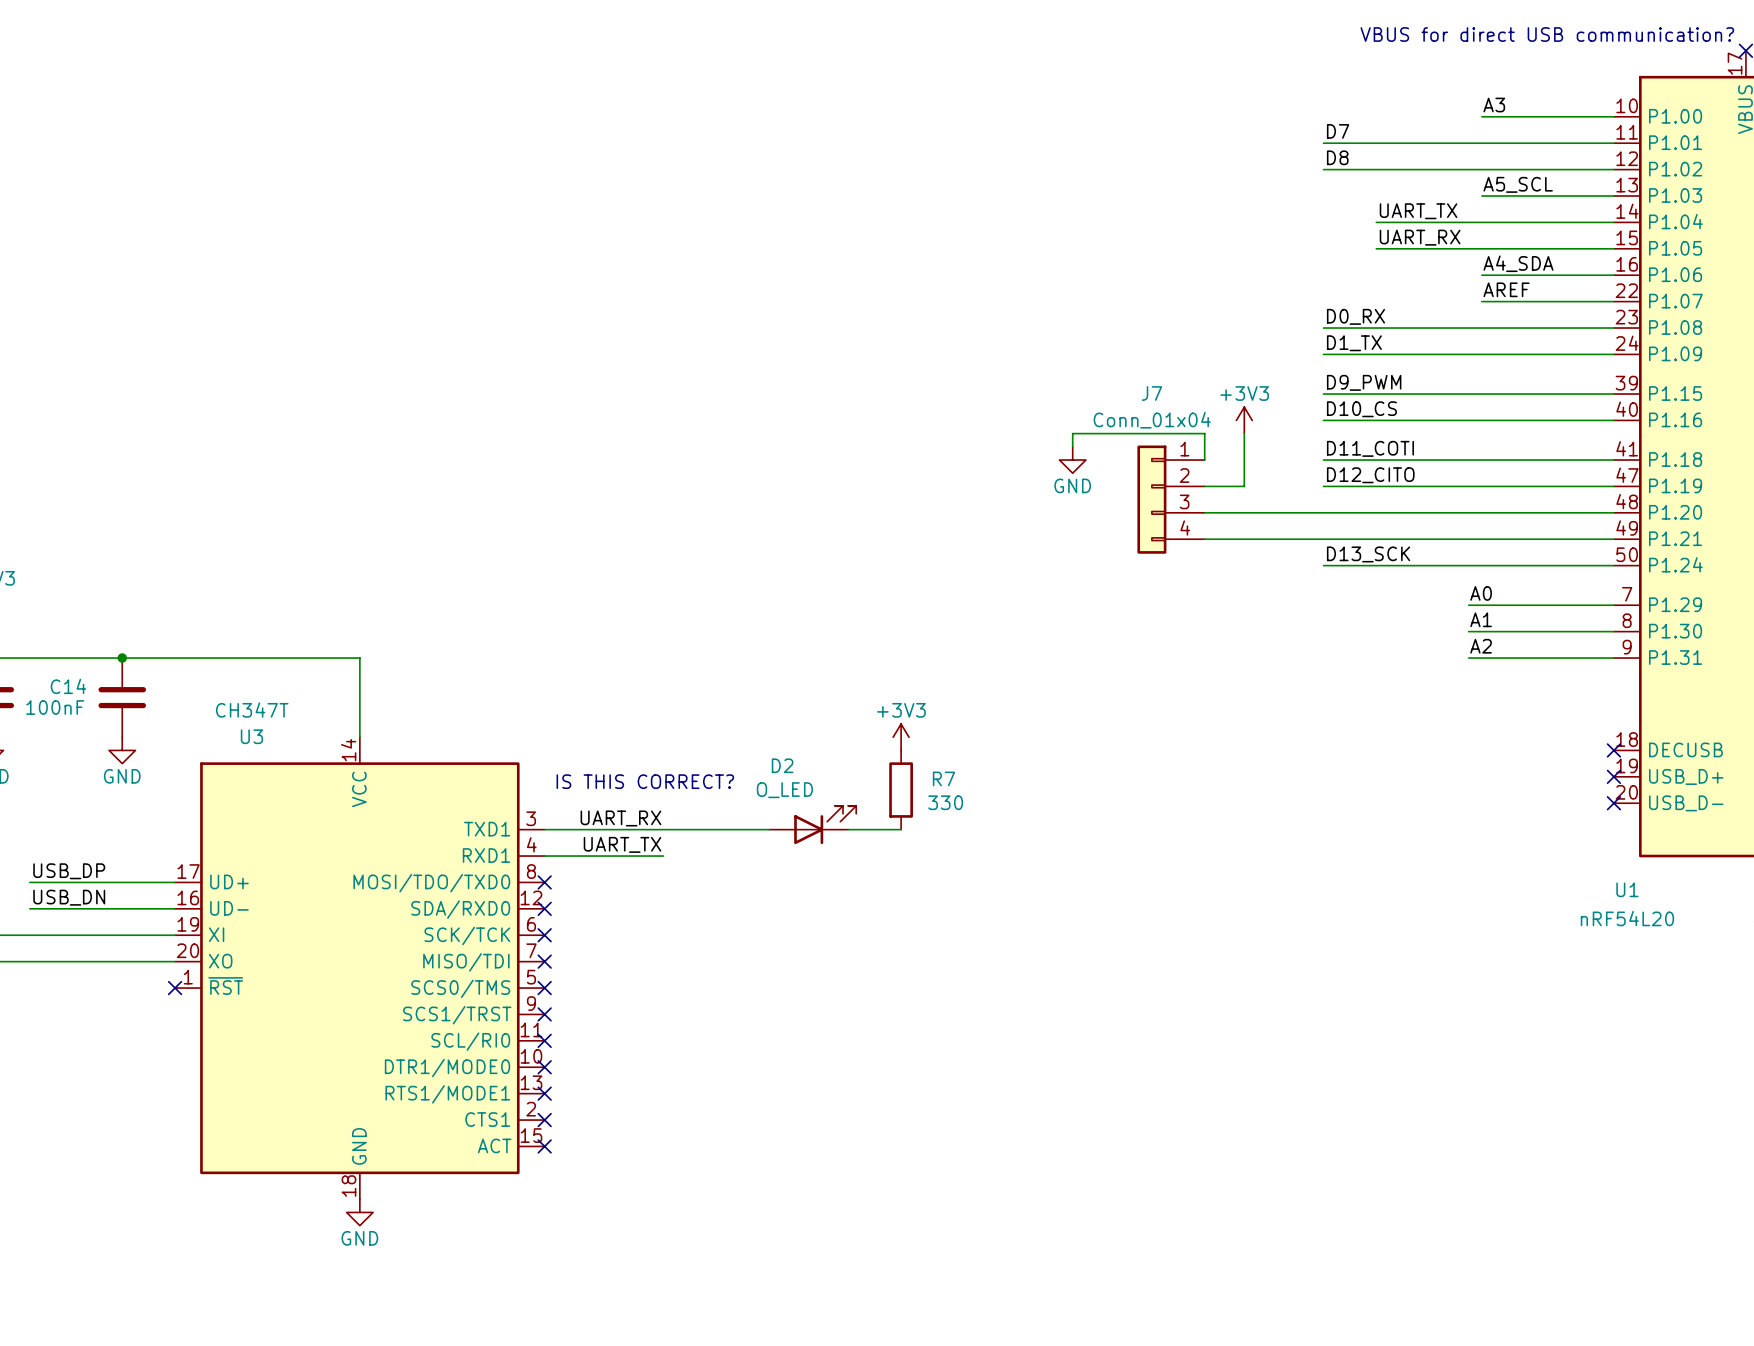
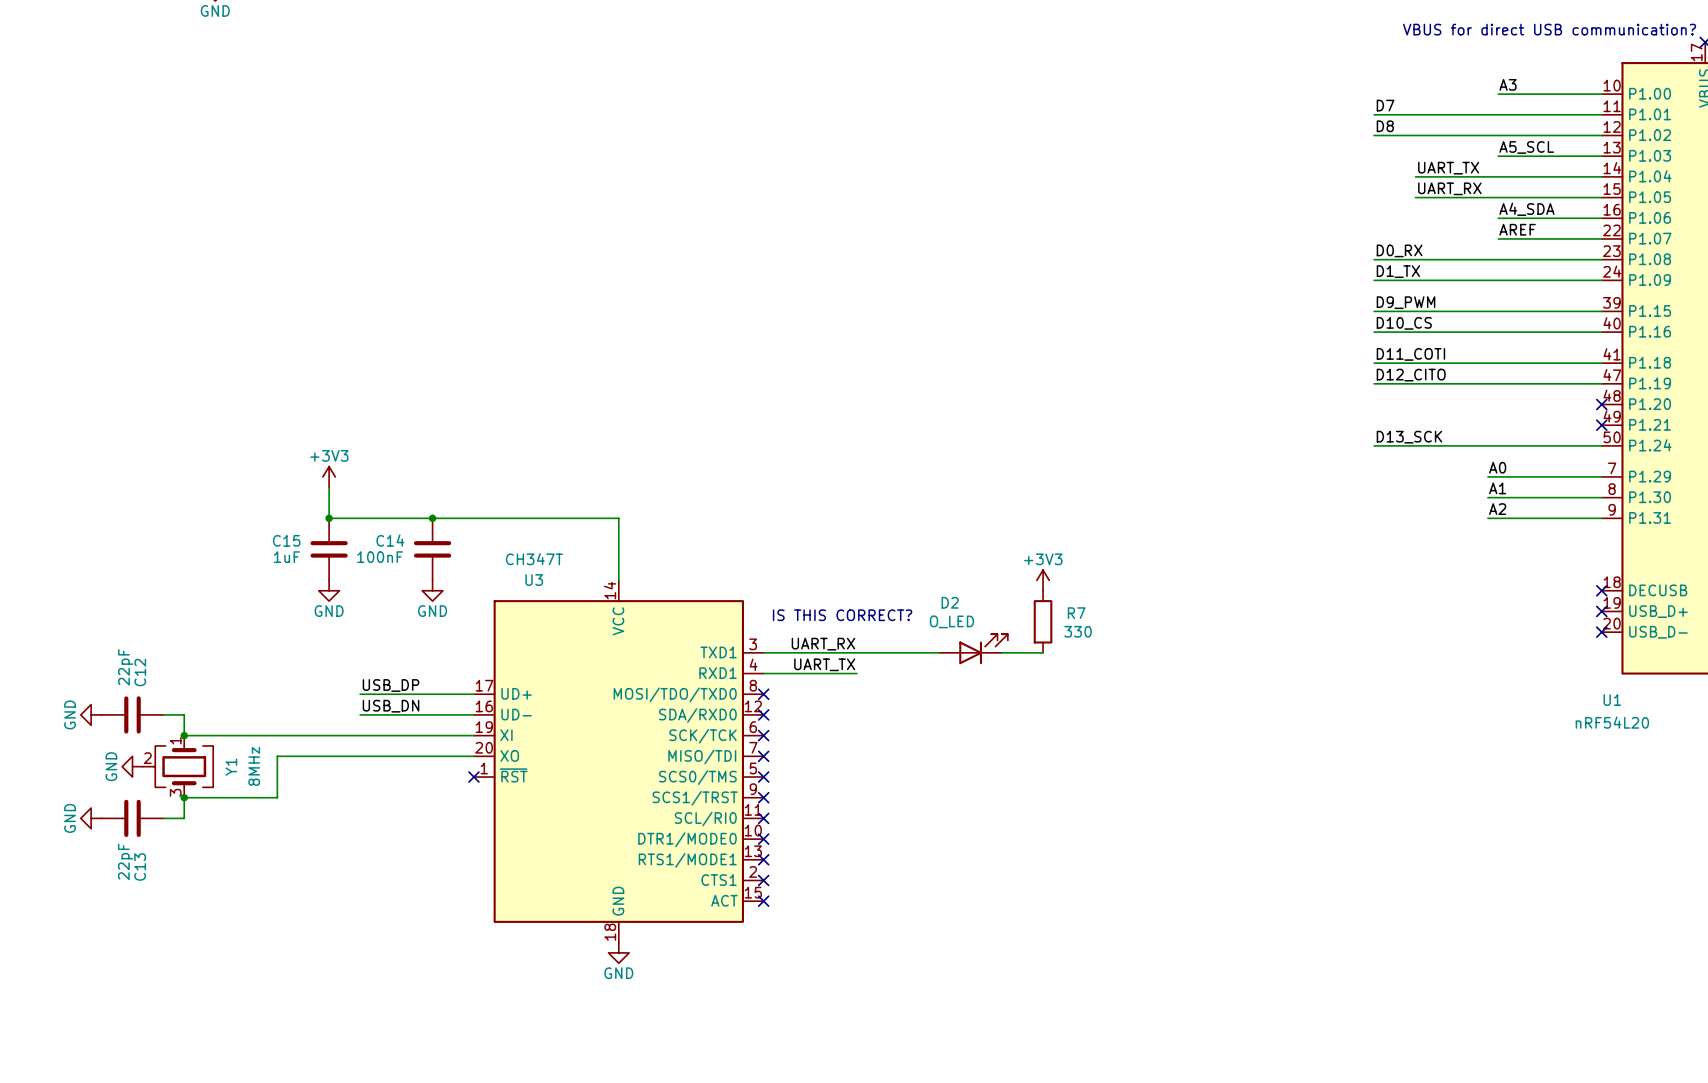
power symbol: +3V3 (1244, 420) -> none
wire: (1244, 433) (1244, 486) (1204, 486) -> none
wire: (1072, 446) (1072, 433) (1204, 433) (1204, 460) -> none
power symbol: GND (1072, 460) -> none
J7: Conn_01x04 (1171, 499) -> none
wire: (1204, 512) (1613, 512) -> none
no-connect mark: none -> (1601, 404)
wire: (1204, 539) (1613, 539) -> none
no-connect mark: none -> (1601, 425)

